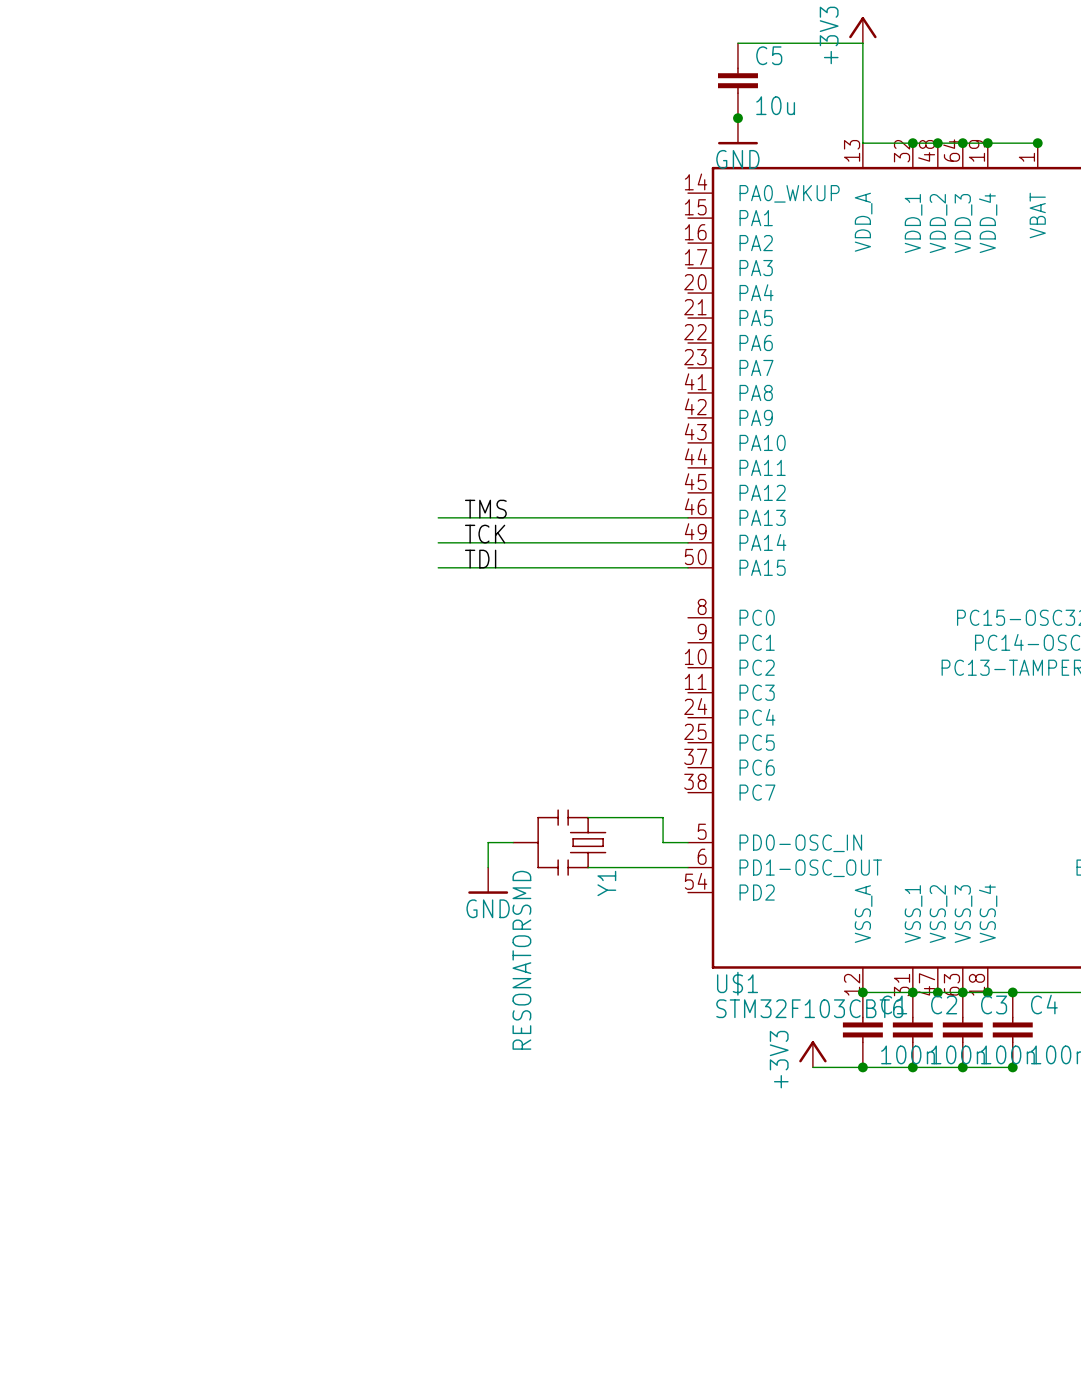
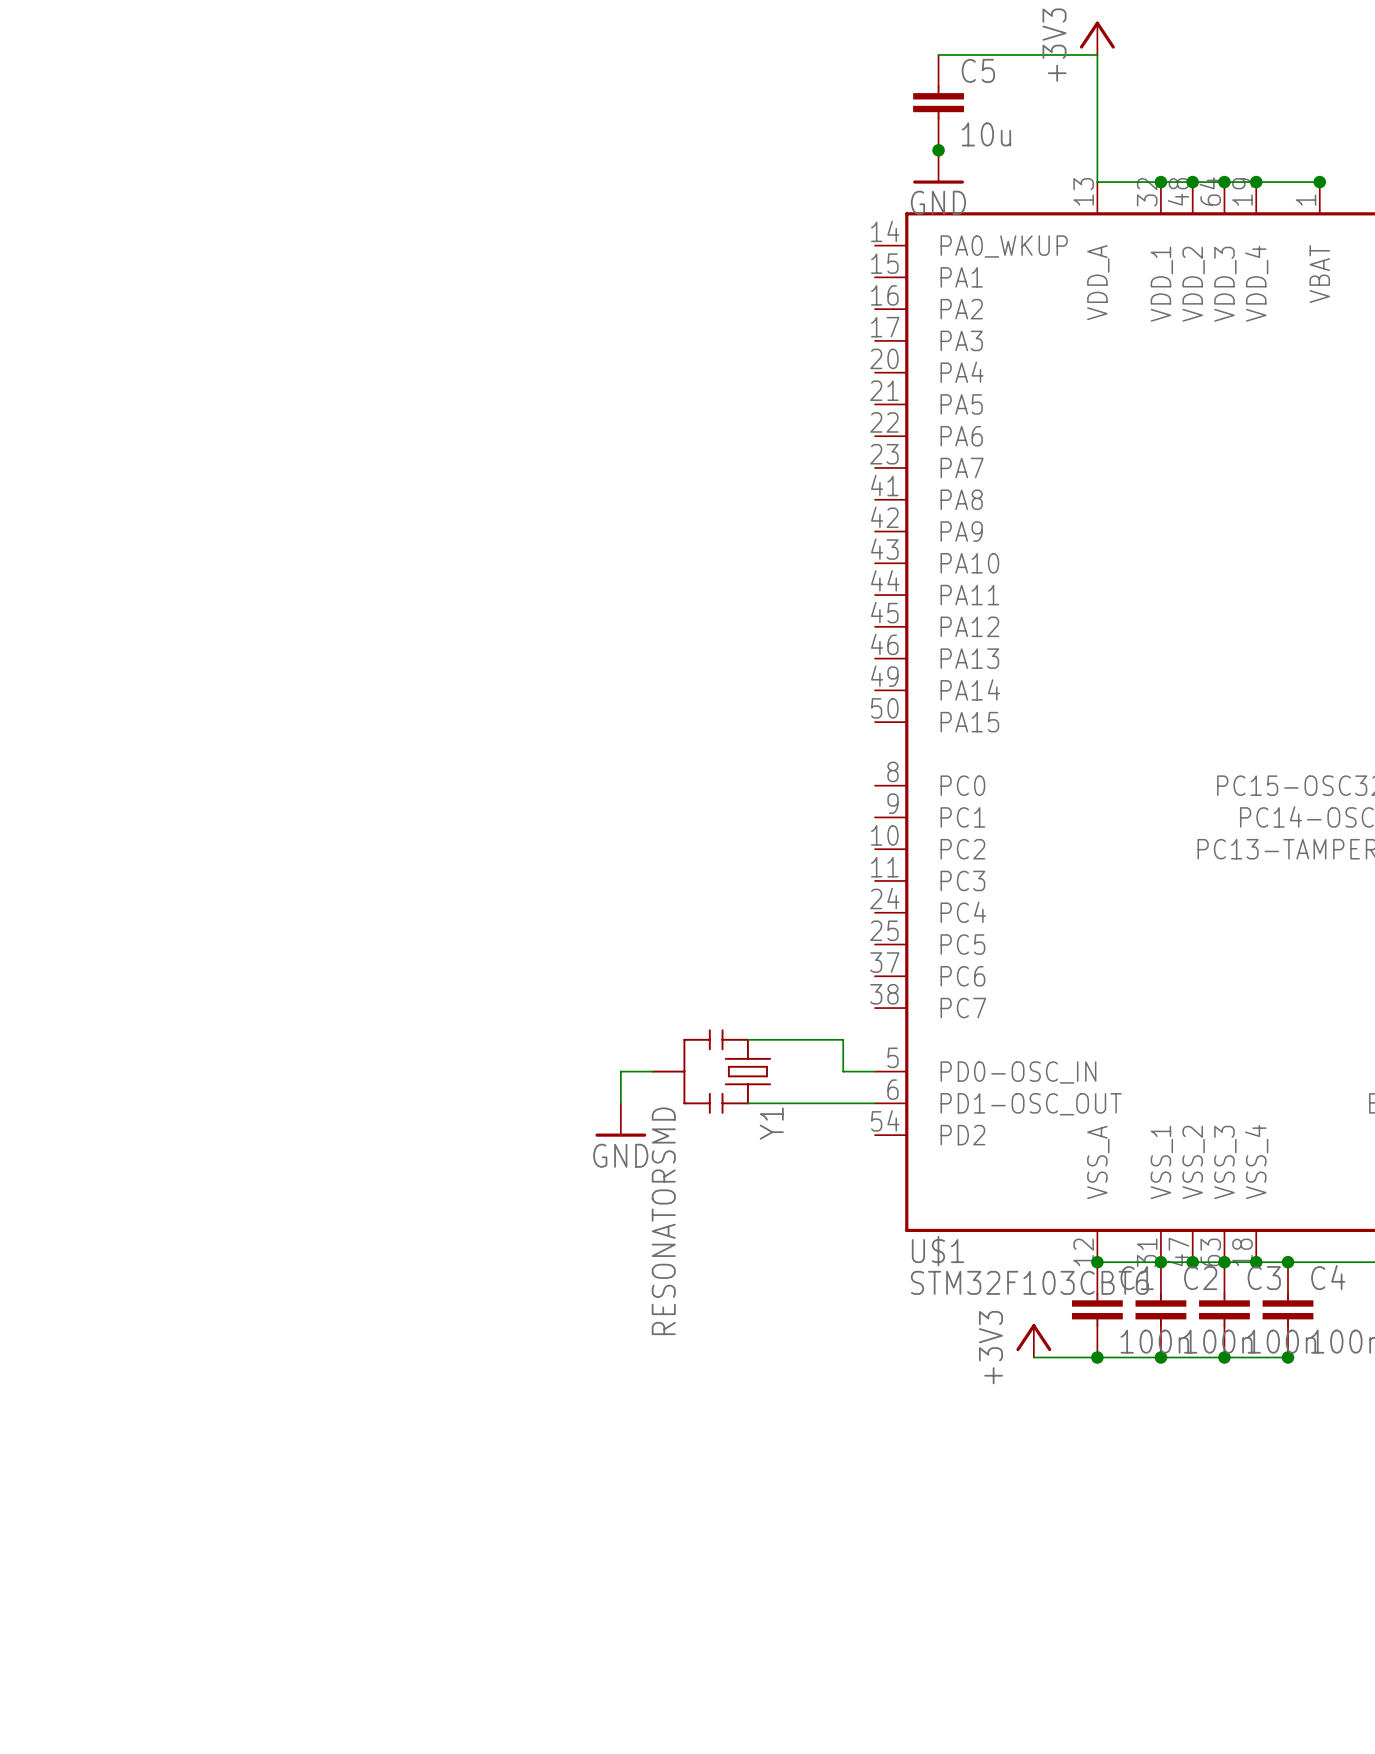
label: TMS (485, 509) -> none
wire: (438, 517) (688, 517) -> none
label: TCK (485, 534) -> none
wire: (438, 542) (688, 542) -> none
label: TDI (480, 559) -> none
wire: (438, 567) (688, 567) -> none

